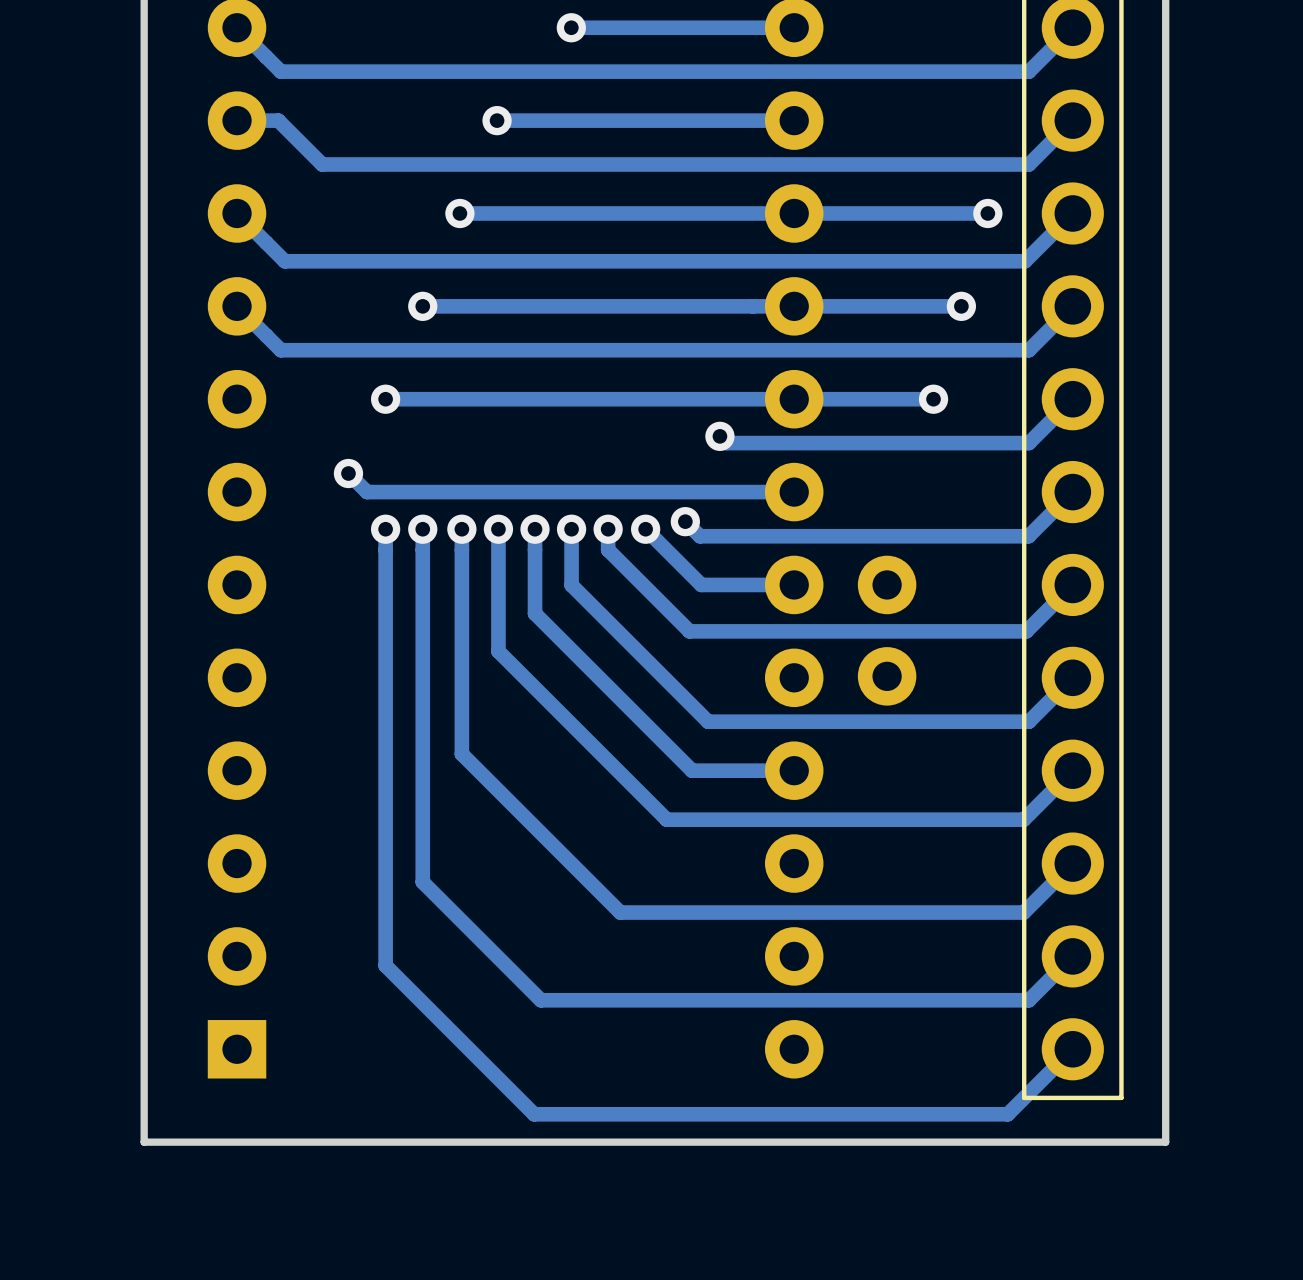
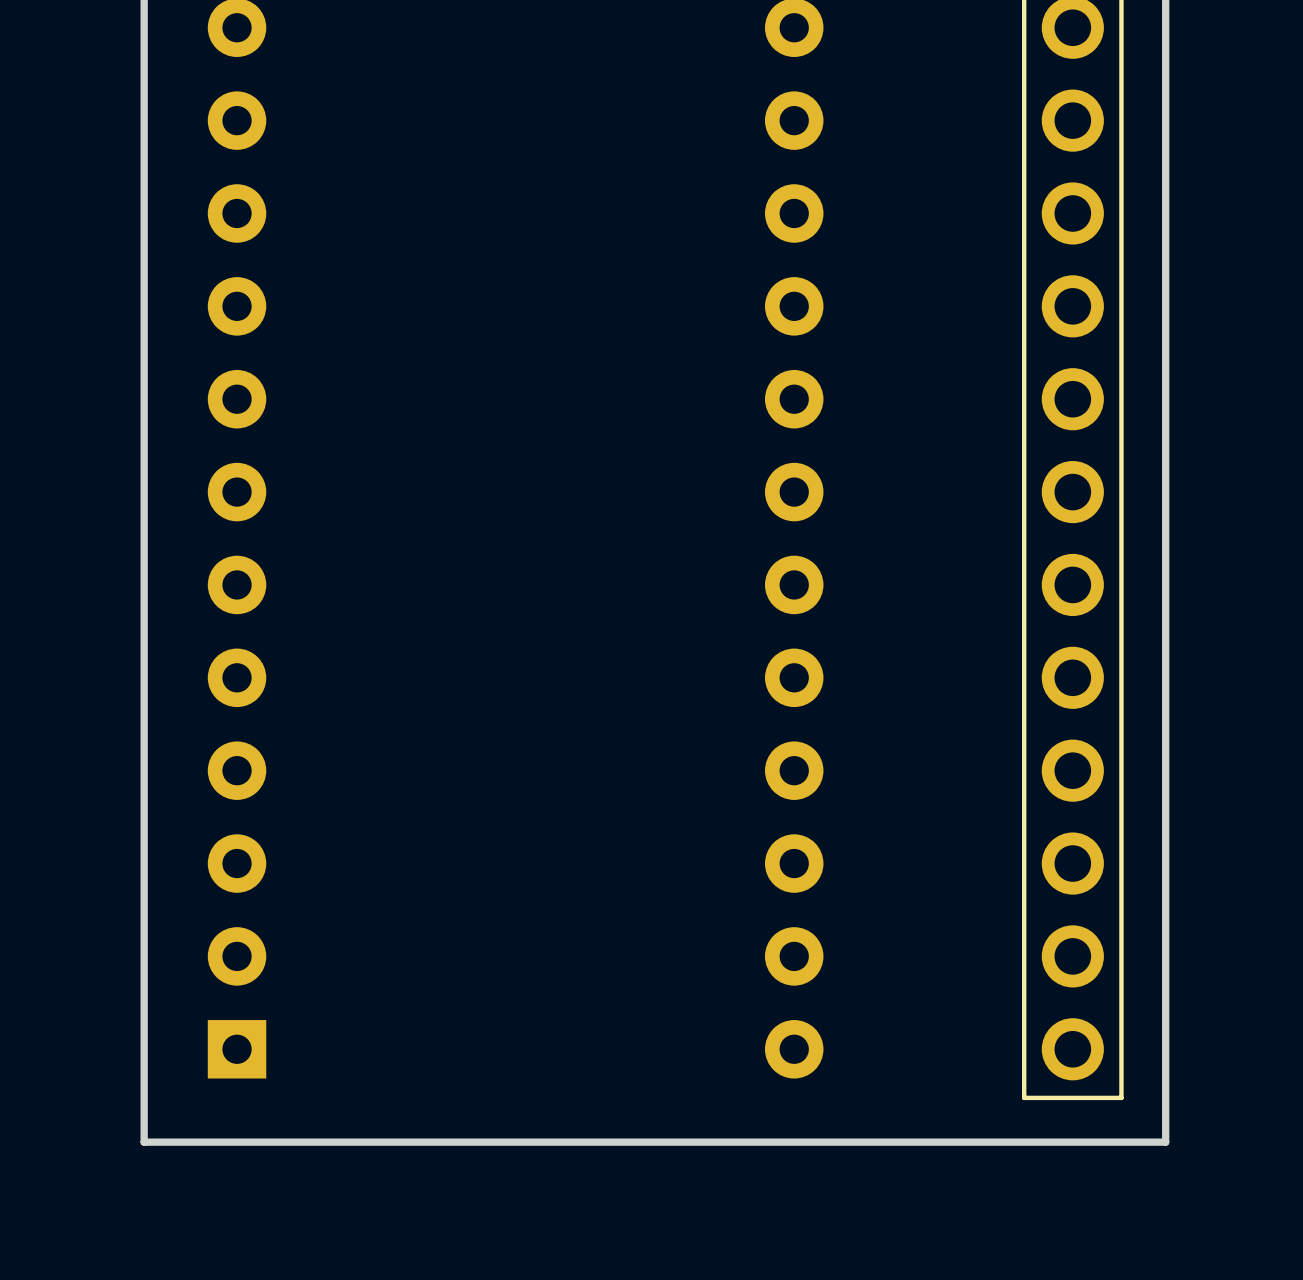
via: (571, 27) -> none
track: (794, 27) (571, 27) -> none
track: (1072, 27) (1028, 71) (280, 71) (237, 27) -> none
via: (497, 120) -> none
track: (794, 120) (497, 120) -> none
track: (1072, 120) (1028, 164) (322, 164) (278, 120) (237, 120) -> none
via: (459, 213) -> none
track: (987, 213) (459, 213) -> none
via: (987, 213) -> none
track: (1072, 213) (1025, 261) (284, 261) (237, 213) -> none
via: (422, 306) -> none
track: (961, 306) (422, 306) -> none
via: (961, 306) -> none
track: (1072, 306) (1028, 350) (280, 350) (237, 306) -> none
via: (385, 399) -> none
track: (933, 399) (385, 399) -> none
via: (933, 399) -> none
track: (1072, 399) (1028, 443) (726, 443) (719, 436) -> none
via: (719, 436) -> none
track: (348, 473) (367, 492) (794, 492) -> none
via: (348, 473) -> none
track: (1072, 492) (1028, 536) (699, 536) (685, 521) -> none
via: (685, 521) -> none
track: (385, 529) (385, 965) (534, 1114) (1007, 1114) (1072, 1049) -> none
via: (385, 529) -> none
track: (422, 529) (422, 882) (540, 1000) (1028, 1000) (1072, 956) -> none
via: (422, 529) -> none
track: (461, 529) (461, 754) (620, 912) (1023, 912) (1072, 863) -> none
via: (461, 529) -> none
track: (498, 529) (498, 651) (666, 819) (1023, 819) (1072, 770) -> none
via: (498, 529) -> none
track: (535, 529) (535, 613) (692, 770) (794, 770) -> none
via: (535, 529) -> none
track: (571, 529) (571, 585) (708, 721) (1028, 721) (1072, 677) -> none
via: (571, 529) -> none
track: (608, 529) (608, 549) (689, 631) (1026, 631) (1072, 584) -> none
via: (608, 529) -> none
track: (645, 529) (701, 584) (794, 584) -> none
via: (645, 529) -> none
part: (887, 630) -> none

